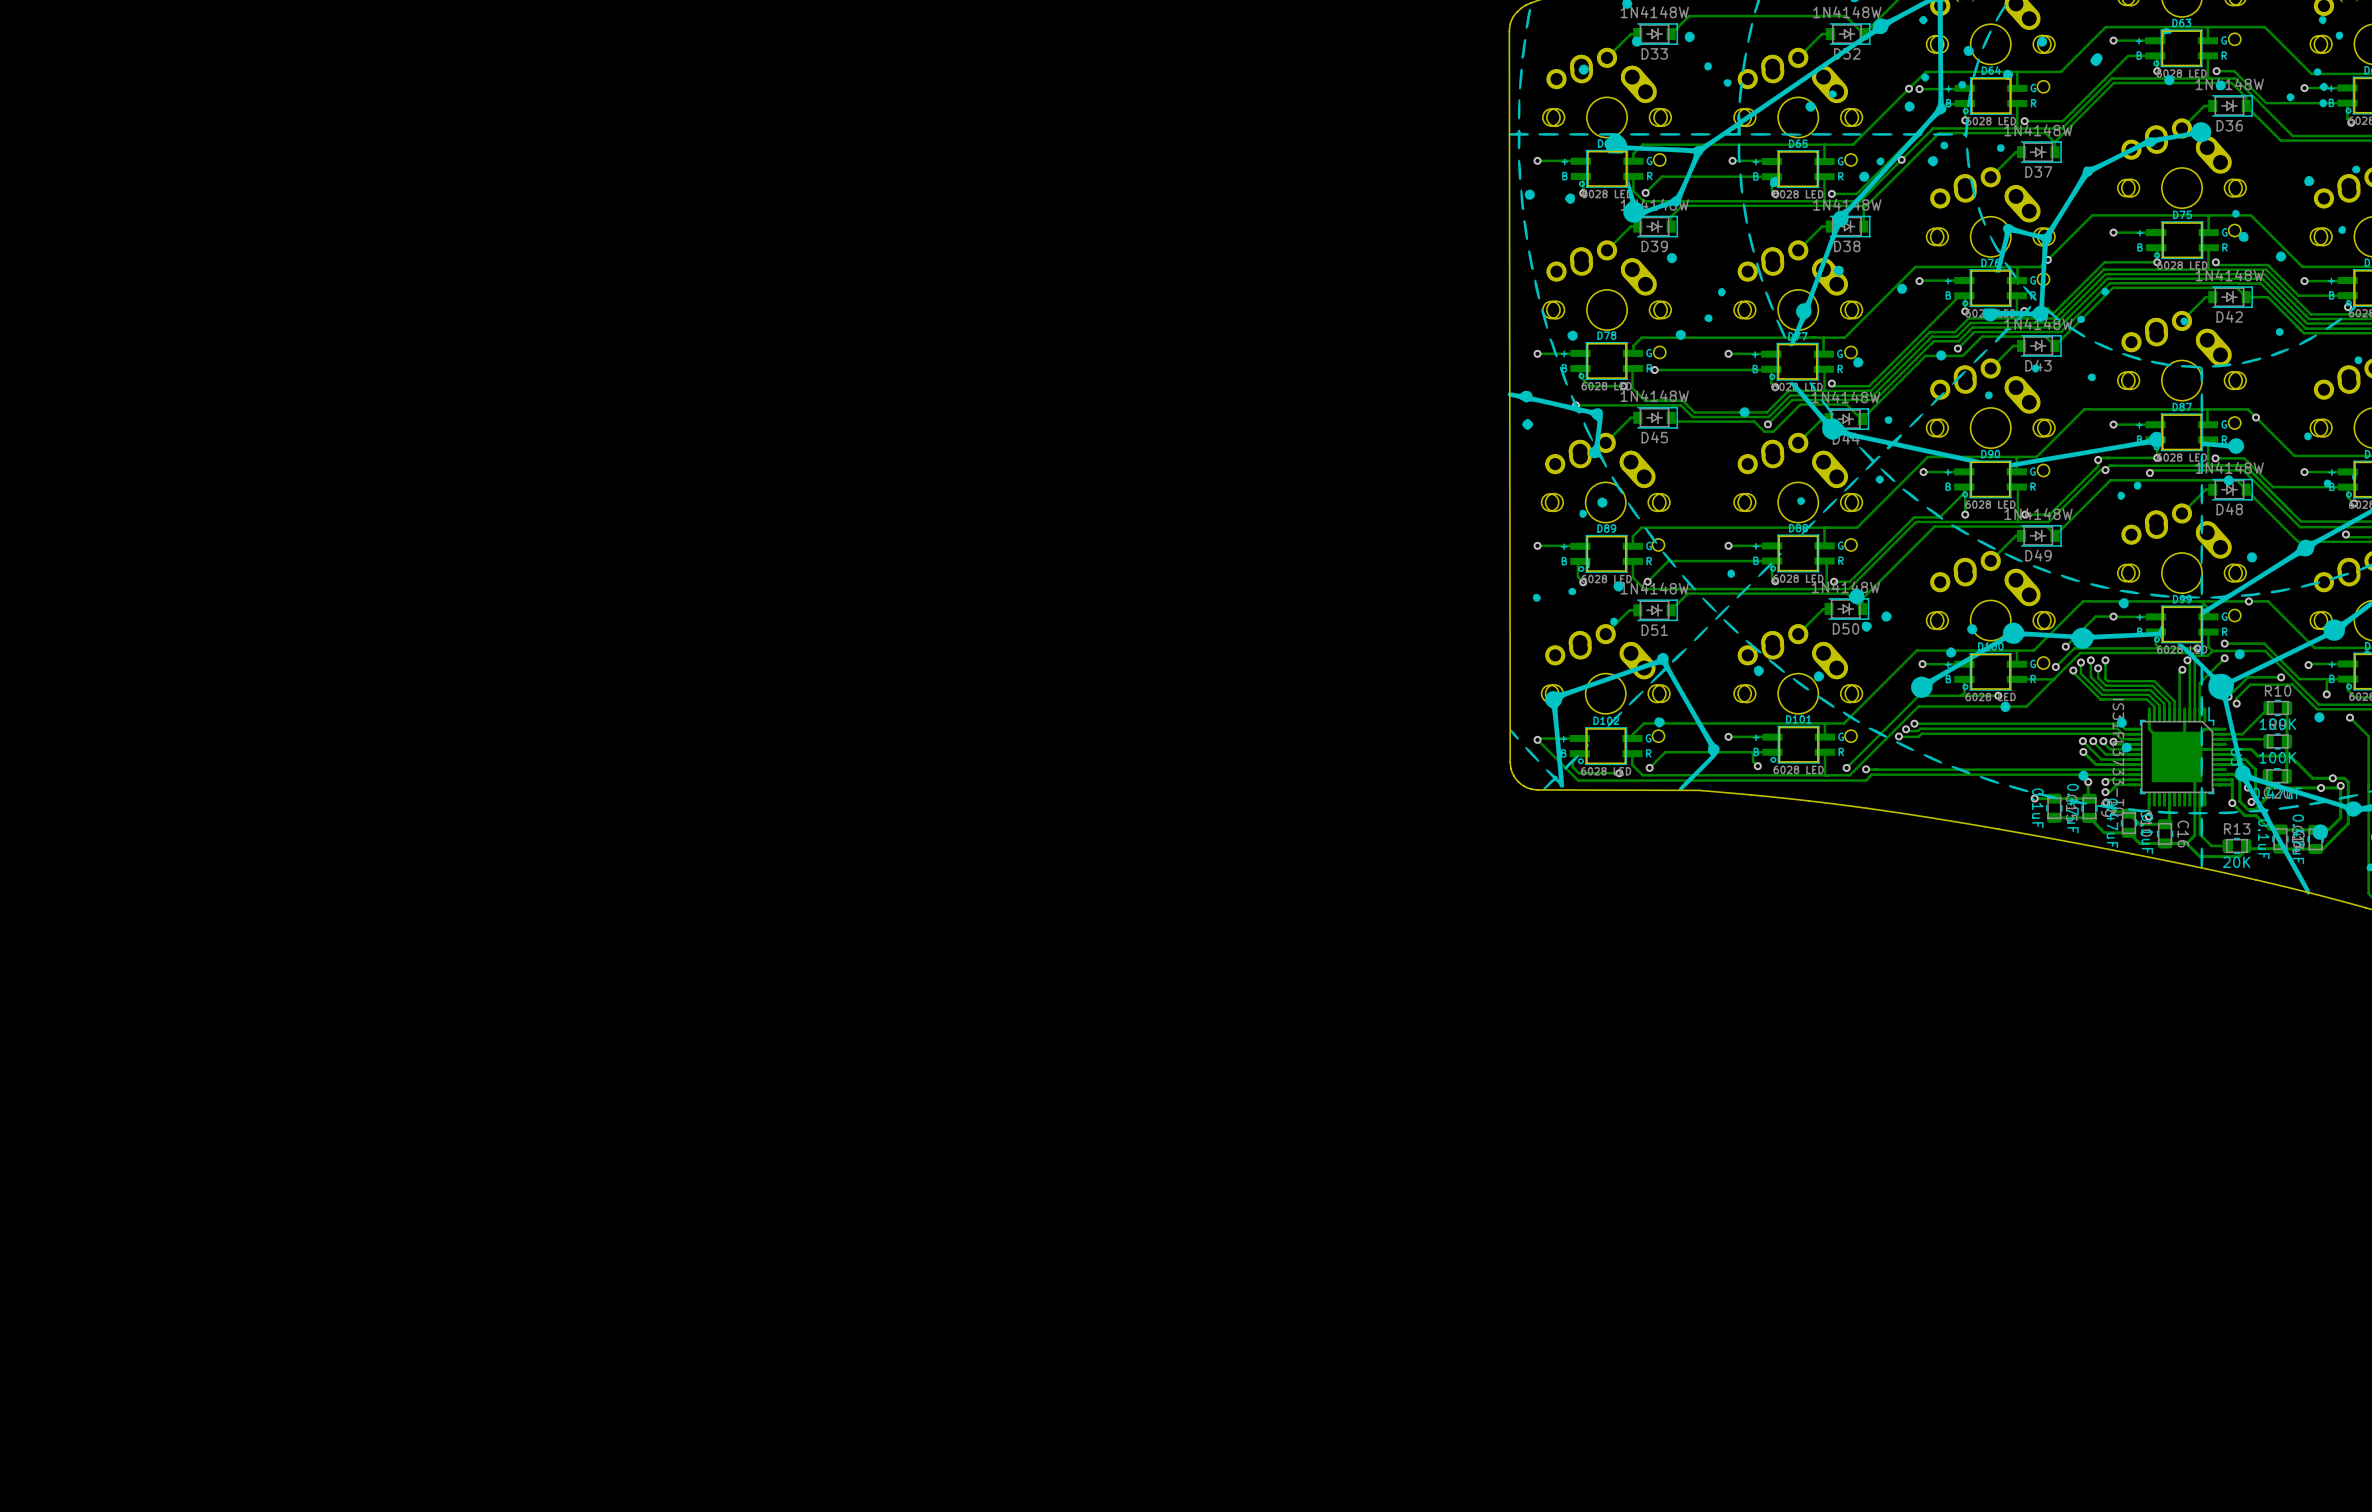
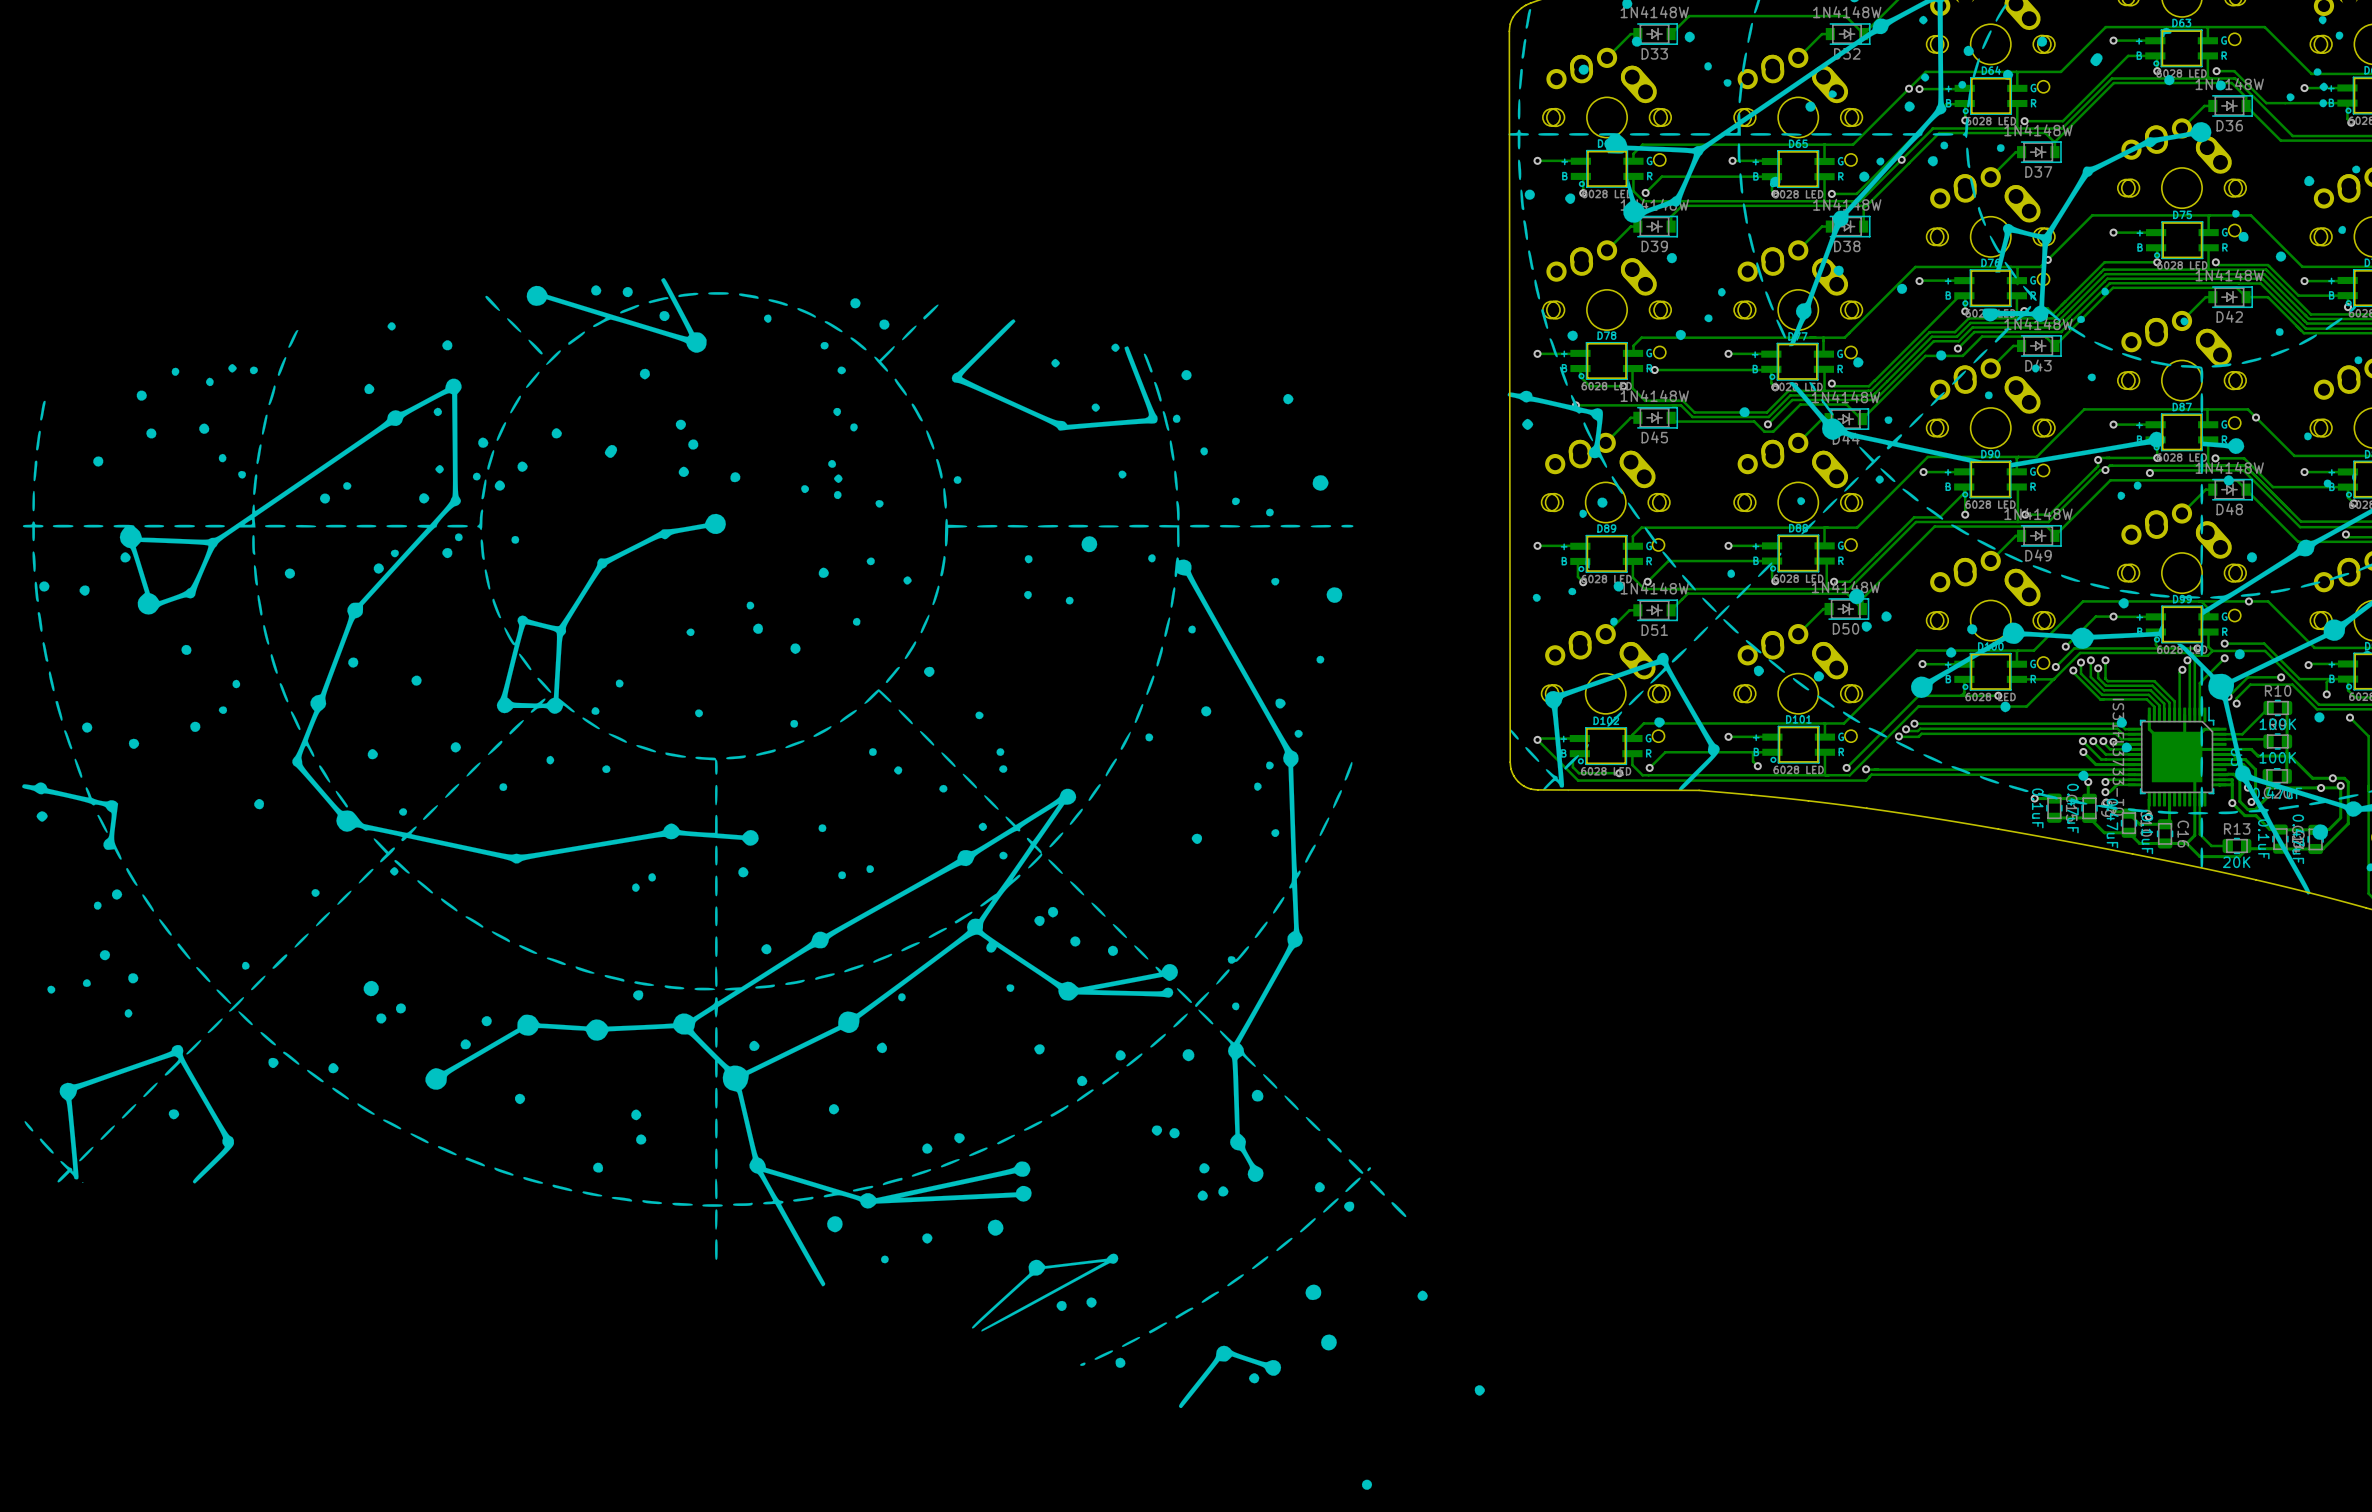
drawing: none -> [22, 278, 1485, 1490]

